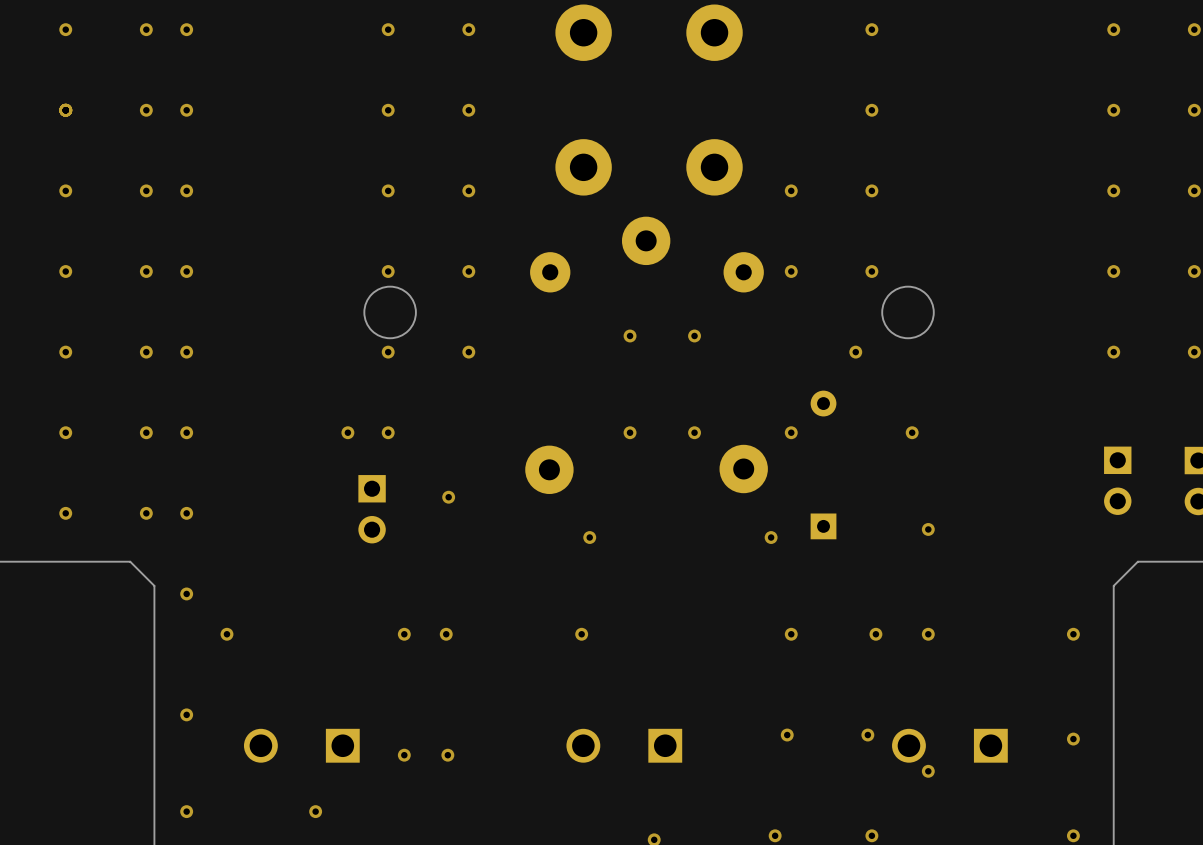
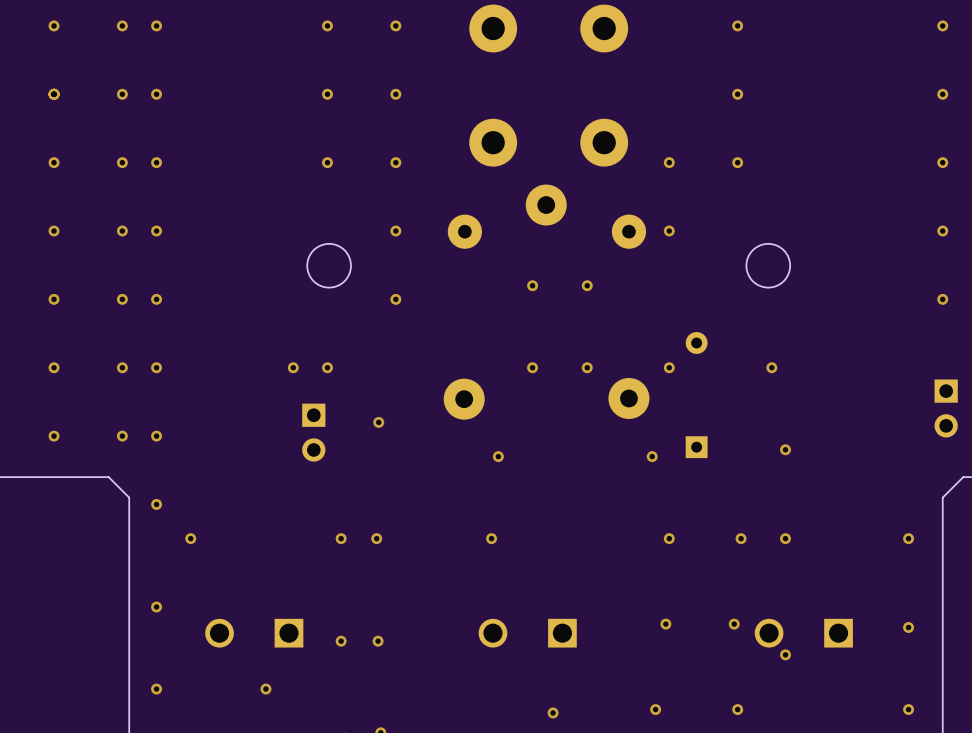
via: (388, 271) -> none
via: (871, 271) -> none
via: (388, 352) -> none
via: (855, 352) -> none

